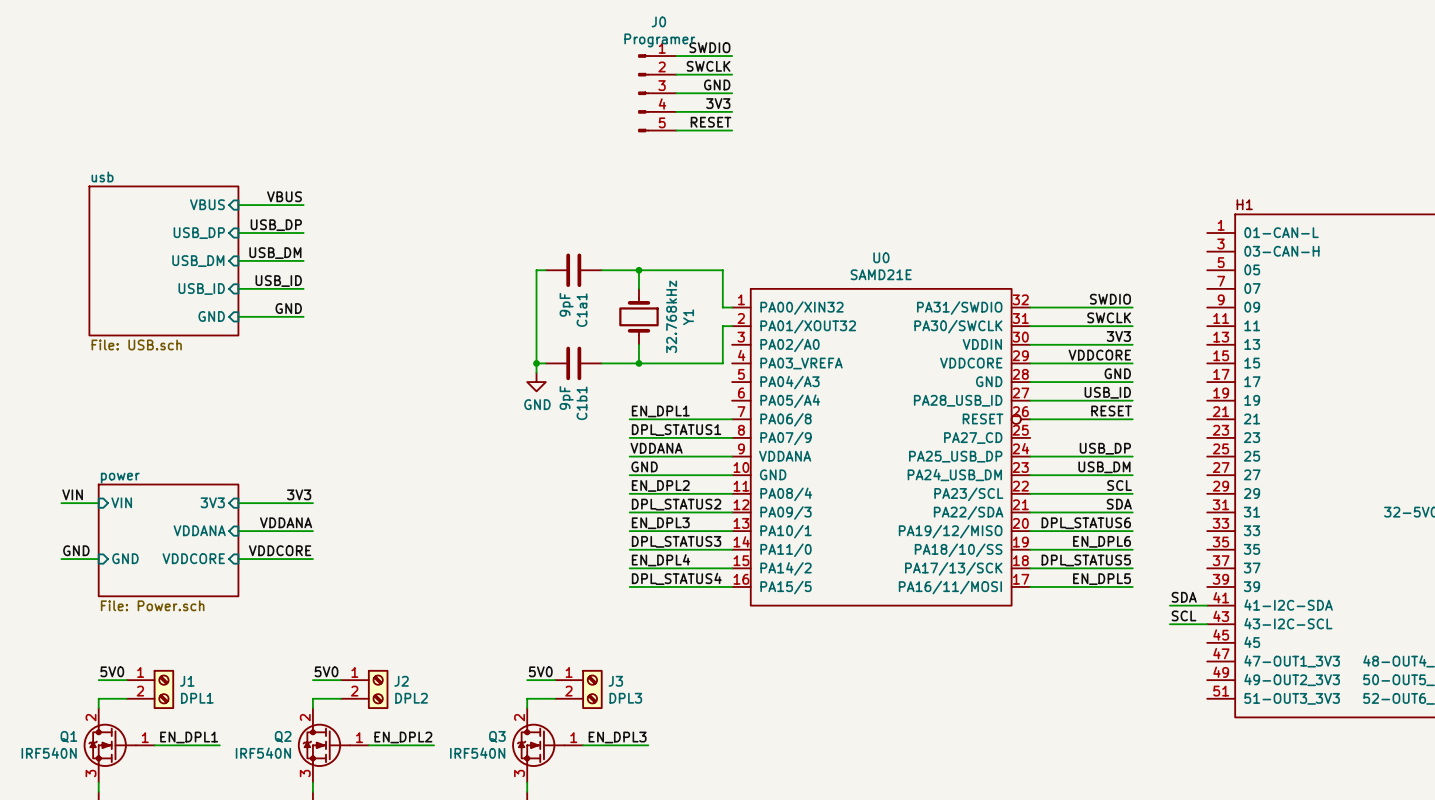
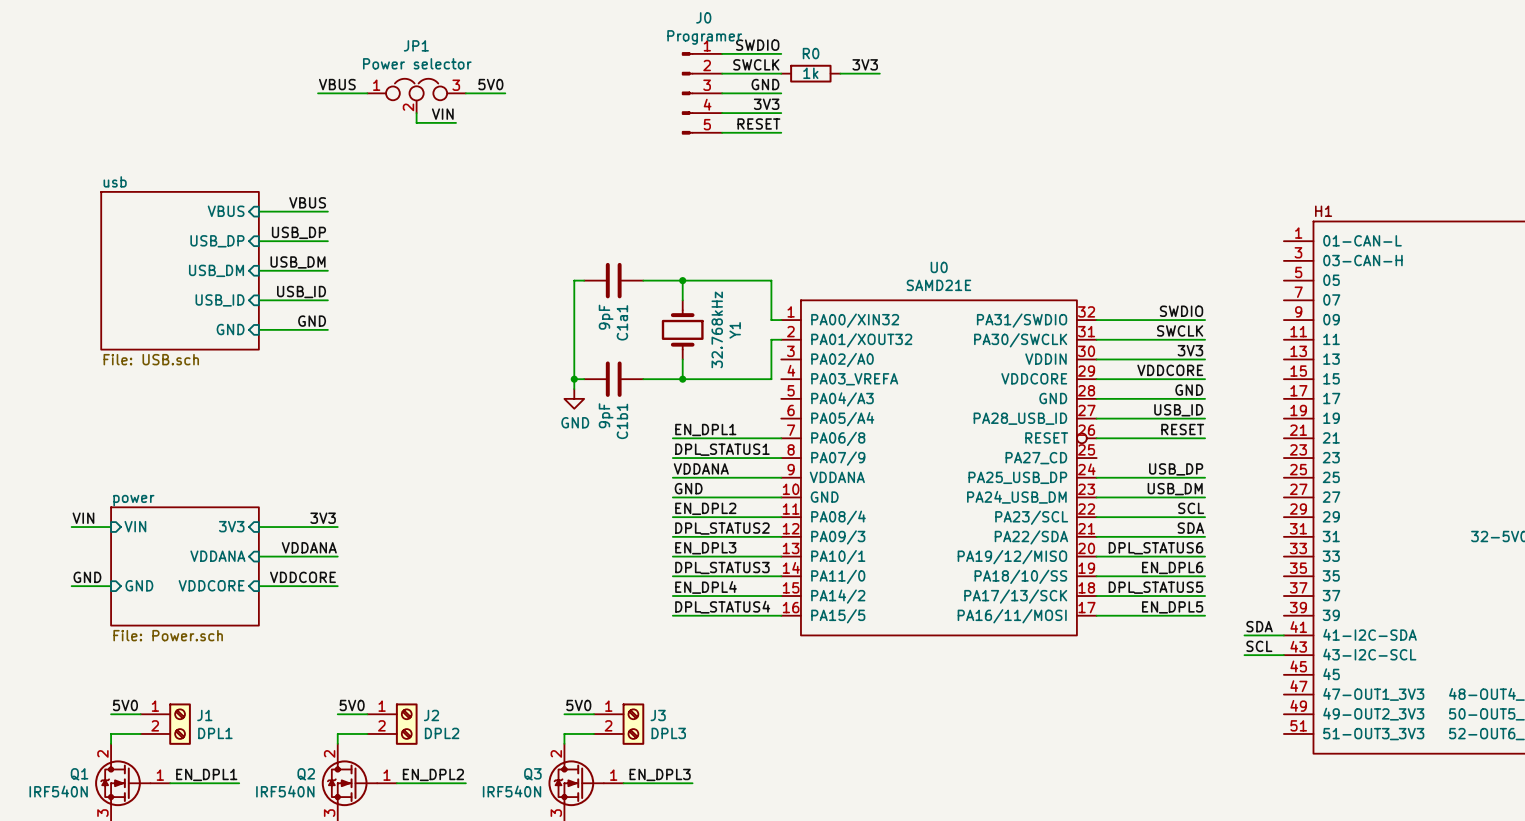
label: none -> 3V3 (865, 64)
R0: none -> 1k (810, 73)
wire: none -> (840, 73) (879, 73)
label: none -> VBUS (337, 84)
label: none -> 5V0 (490, 84)
wire: none -> (318, 93) (367, 93)
wire: none -> (465, 93) (505, 93)
JP1: none -> Power selector (416, 95)
wire: none -> (416, 113) (416, 122) (456, 122)
label: none -> VIN (442, 114)

